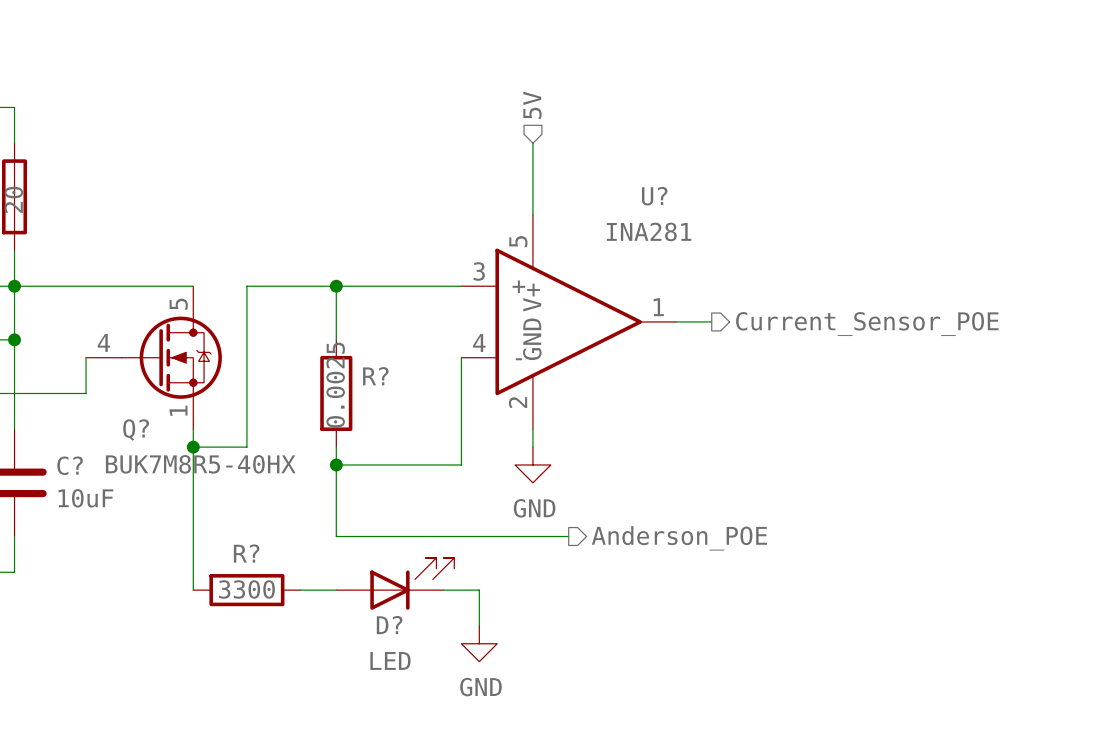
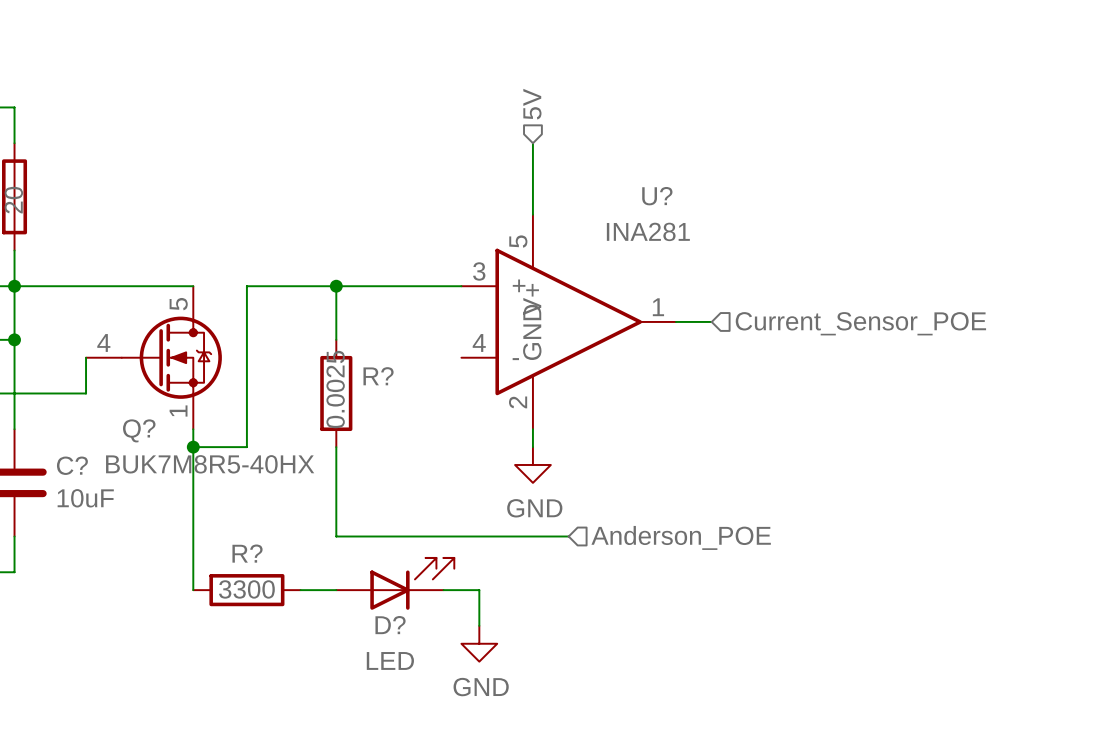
hierarchical label shape: output (867, 324) -> input (860, 323)
wire: (461, 357) (461, 464) (336, 464) -> none
junction: (336, 464) -> none
hierarchical label shape: output (679, 538) -> input (681, 537)

